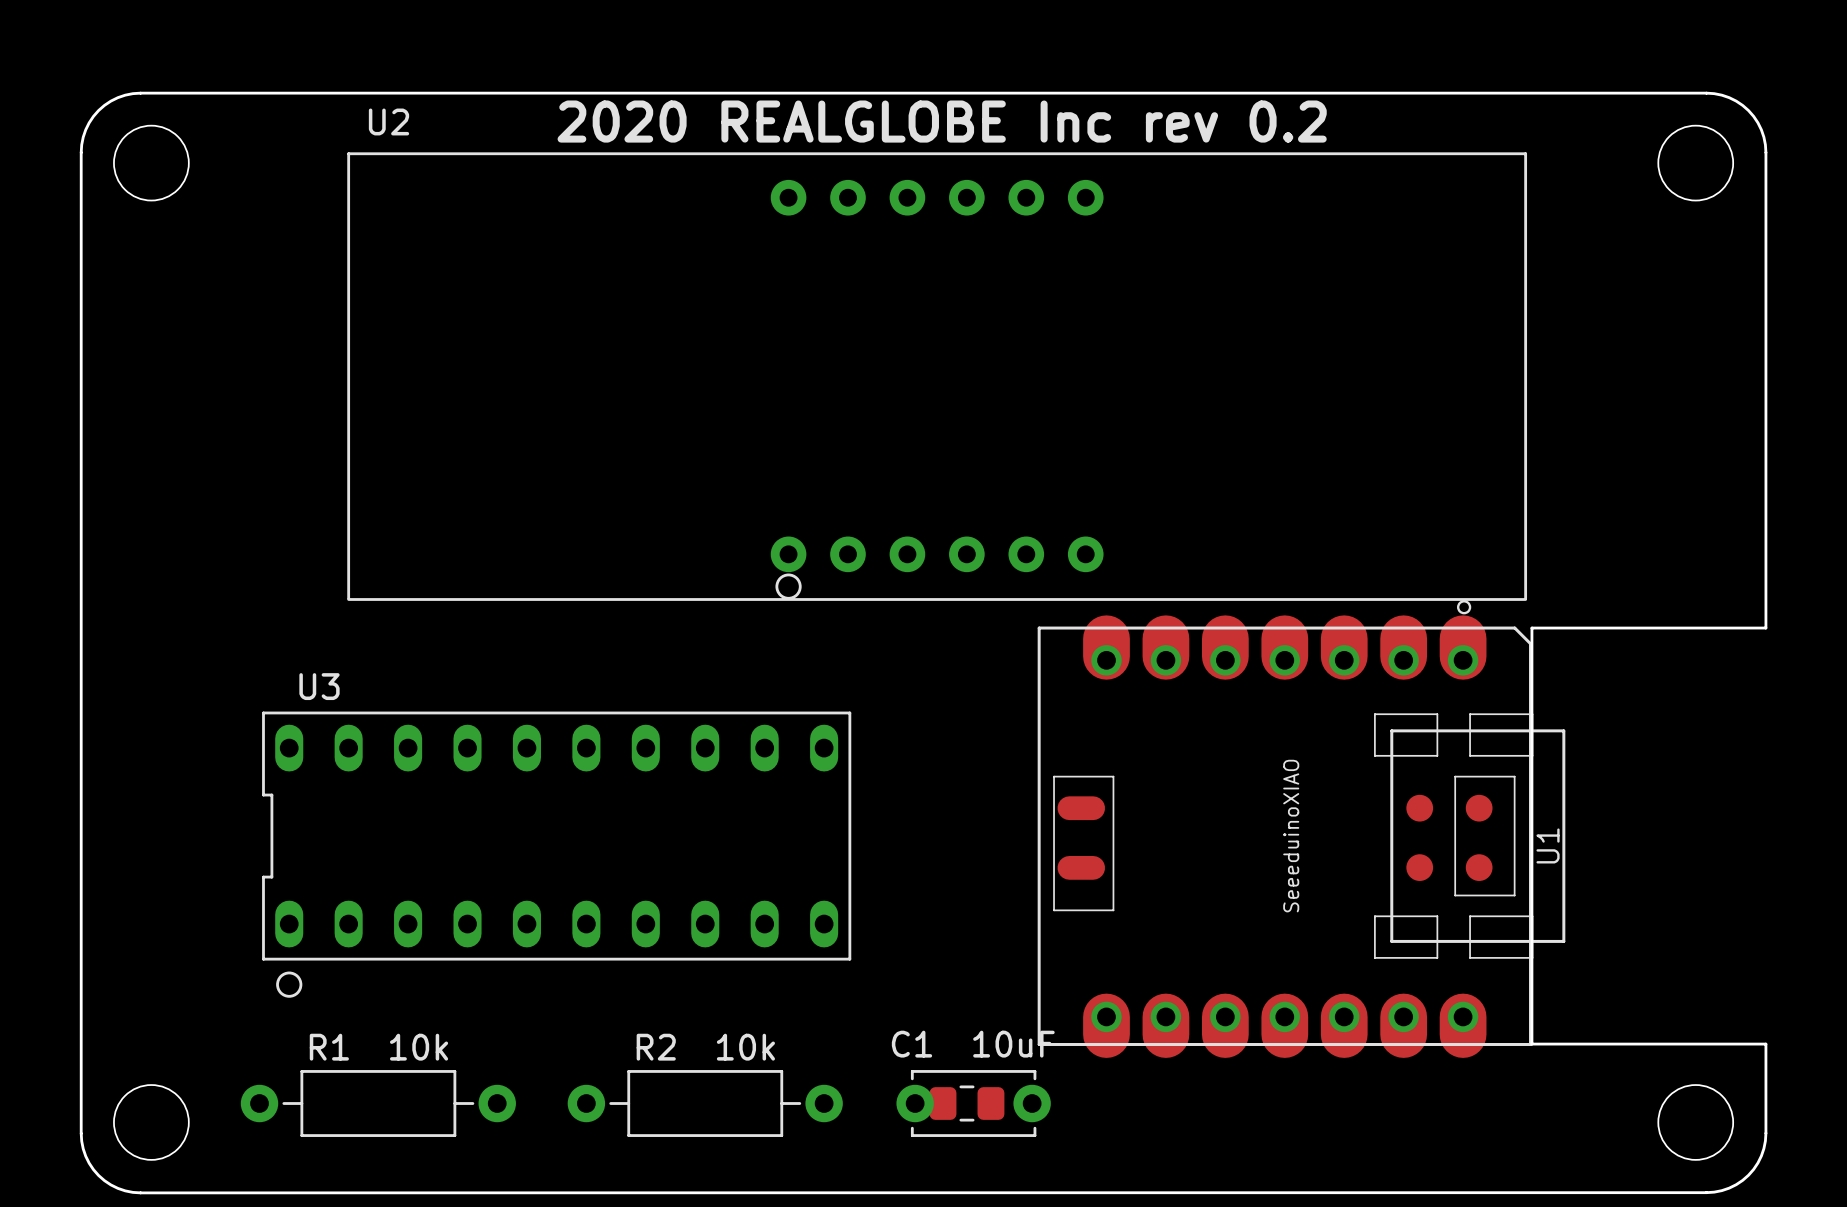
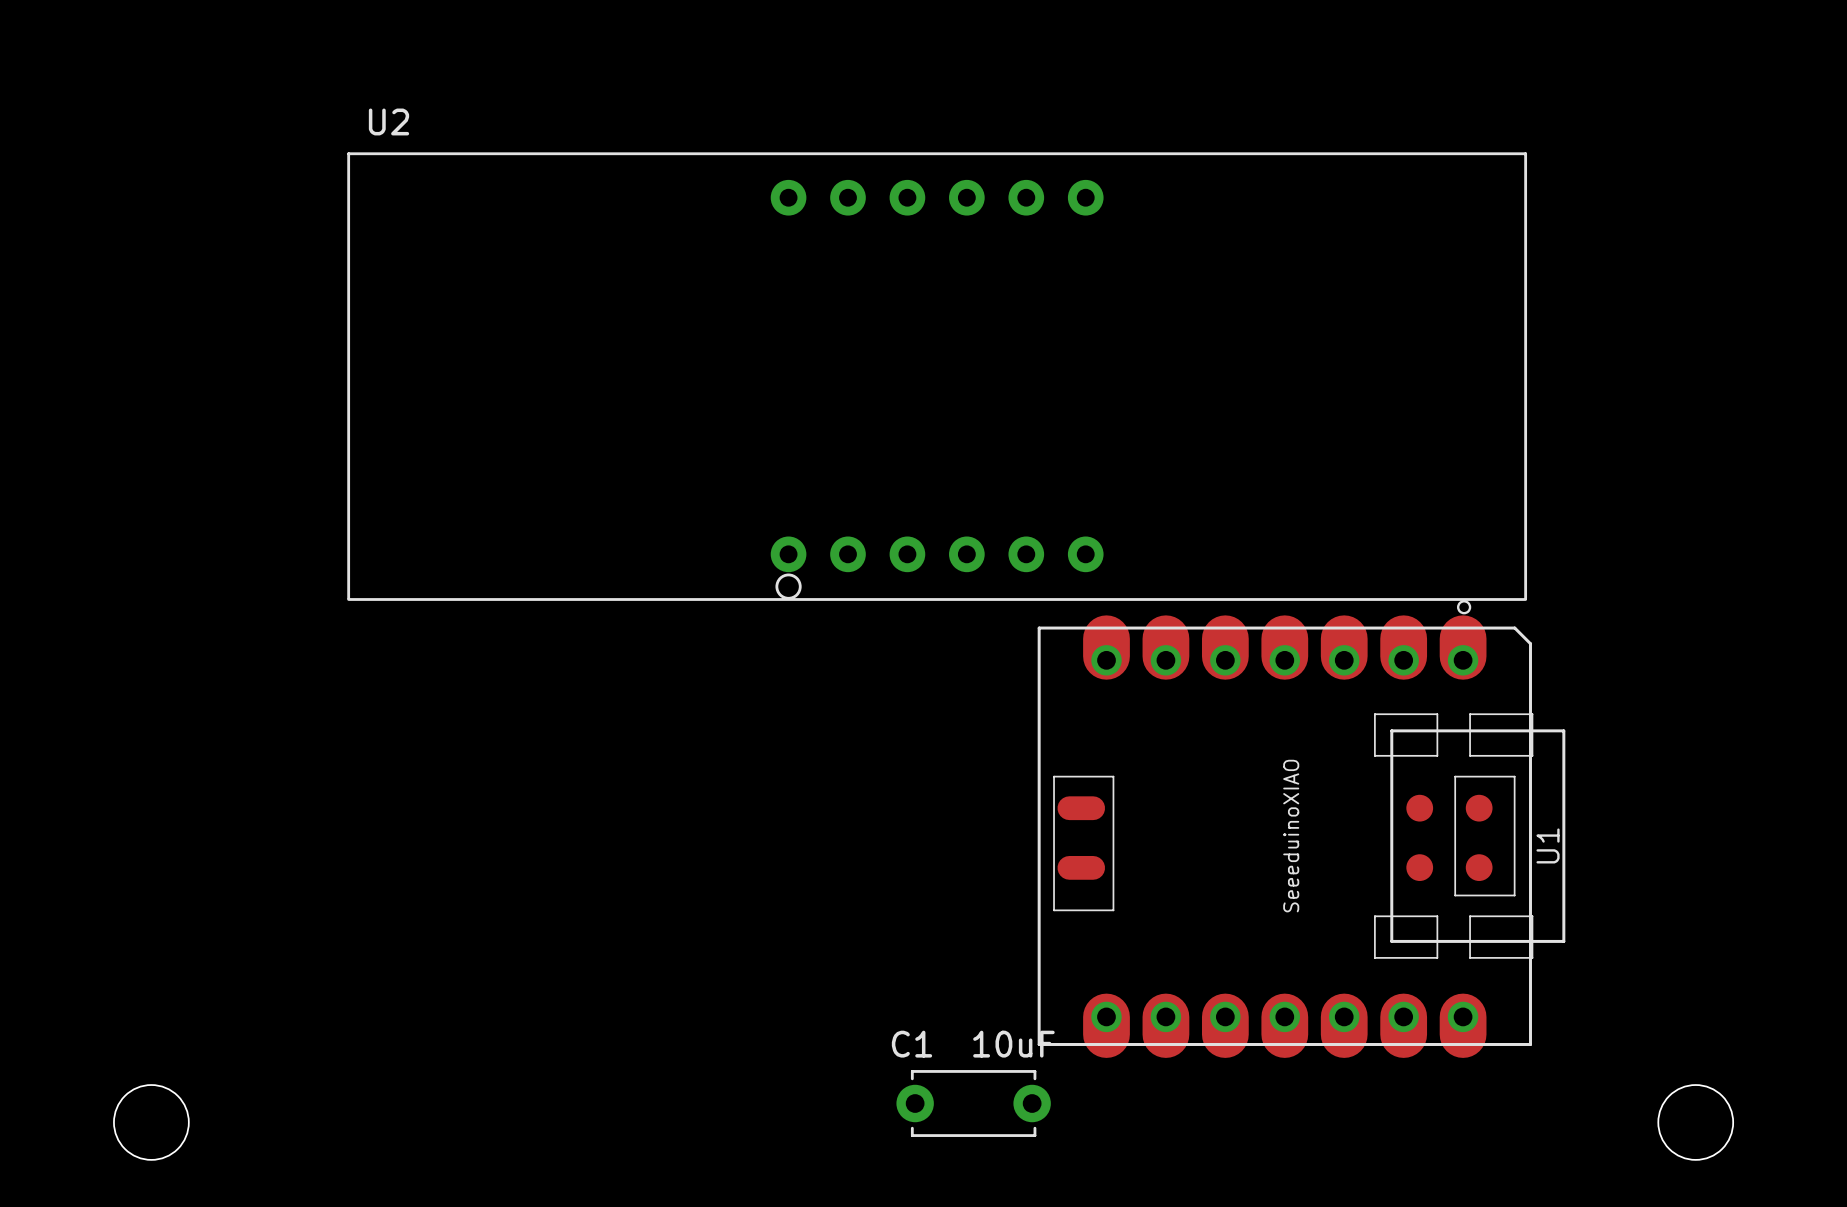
board edge: (140, 93) (1706, 93) (1721, 95) (1736, 101) (1748, 110) (1757, 122) (1763, 137) (1765, 152) (1765, 628) (1531, 628) (1531, 1044) (1765, 1044) (1765, 1140) (1757, 1162) (1748, 1175) (1736, 1184) (1721, 1190) (1706, 1192) (140, 1192) (125, 1190) (110, 1184) (98, 1175) (89, 1163) (83, 1148) (81, 1133) (81, 152) (85, 129) (98, 110) (117, 97) (140, 93) -> none
text: 2020 REALGLOBE Inc rev 0.2 (942, 121) -> none
round board edge: [113, 125, 190, 202] -> none
round board edge: [1657, 125, 1734, 202] -> none
U3: (556, 854) -> none
R1 10k: (378, 1103) -> none
R2 10k: (705, 1103) -> none
part: (966, 1103) -> none

